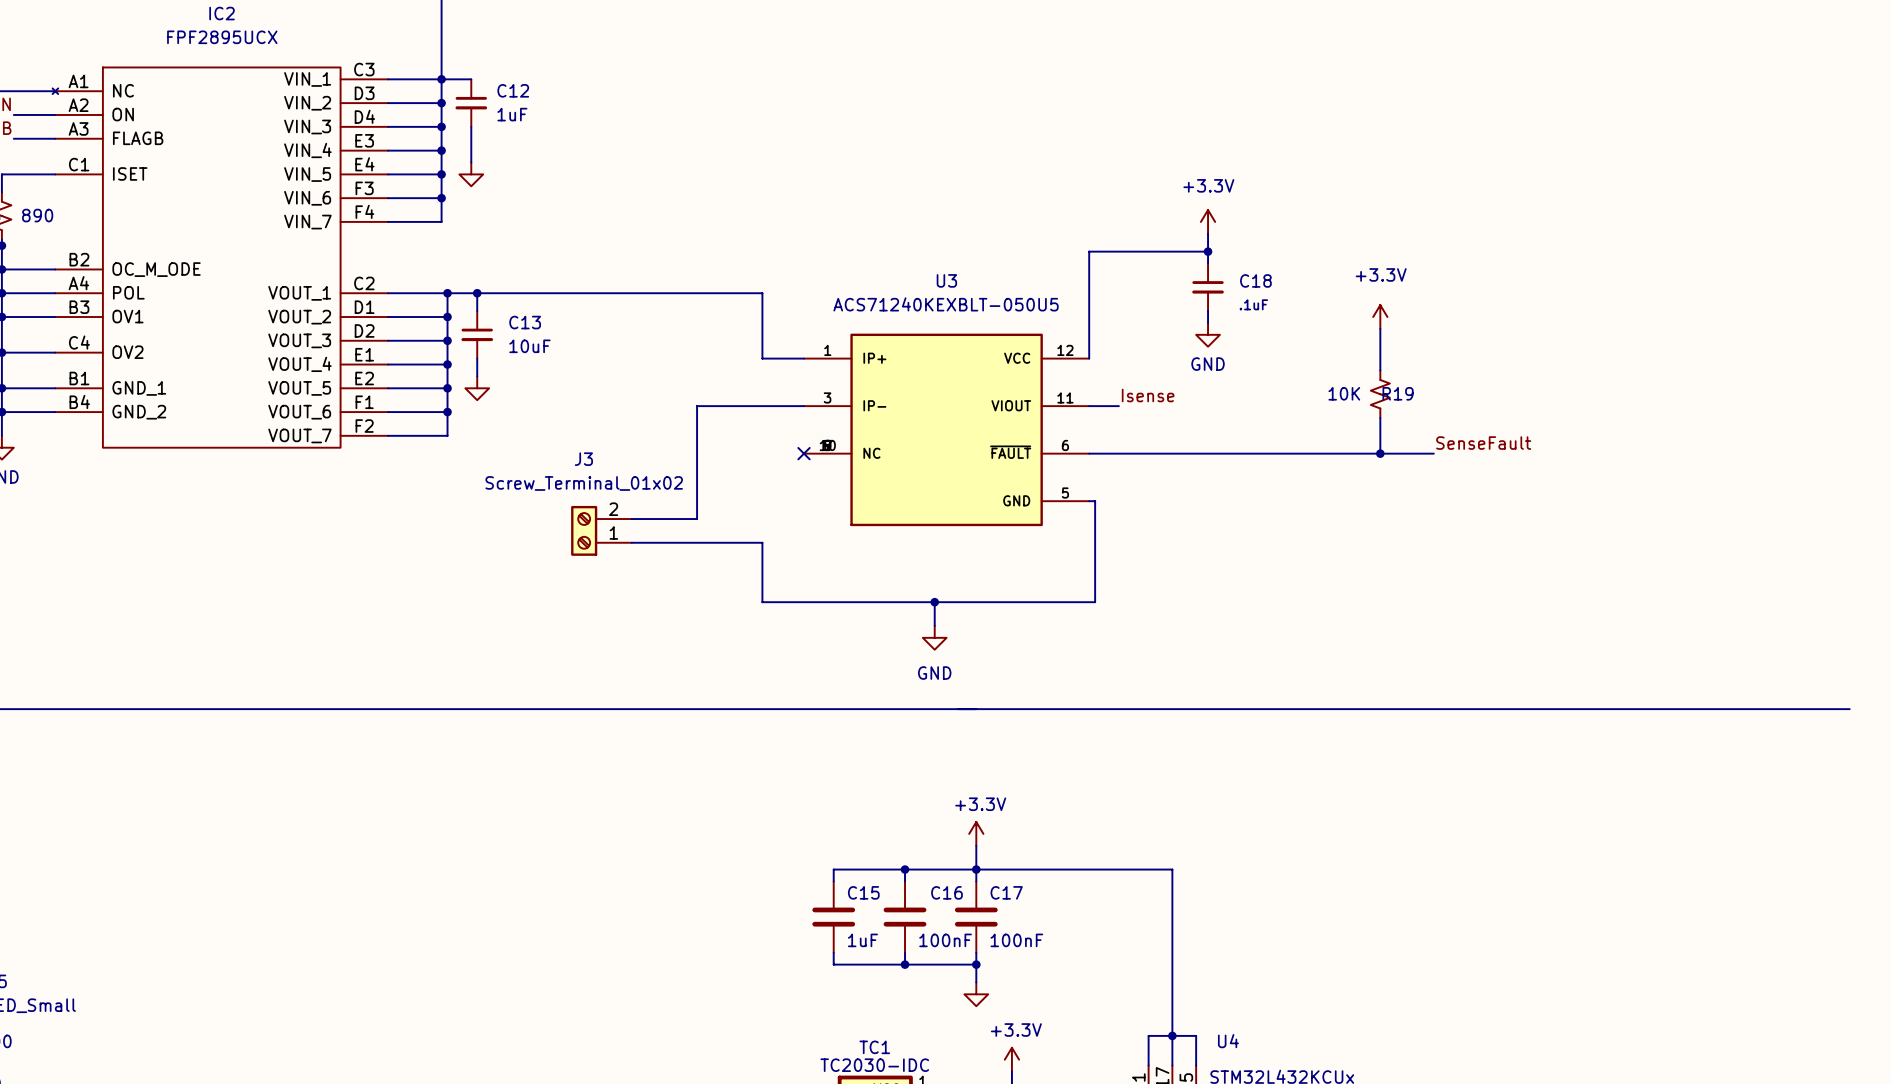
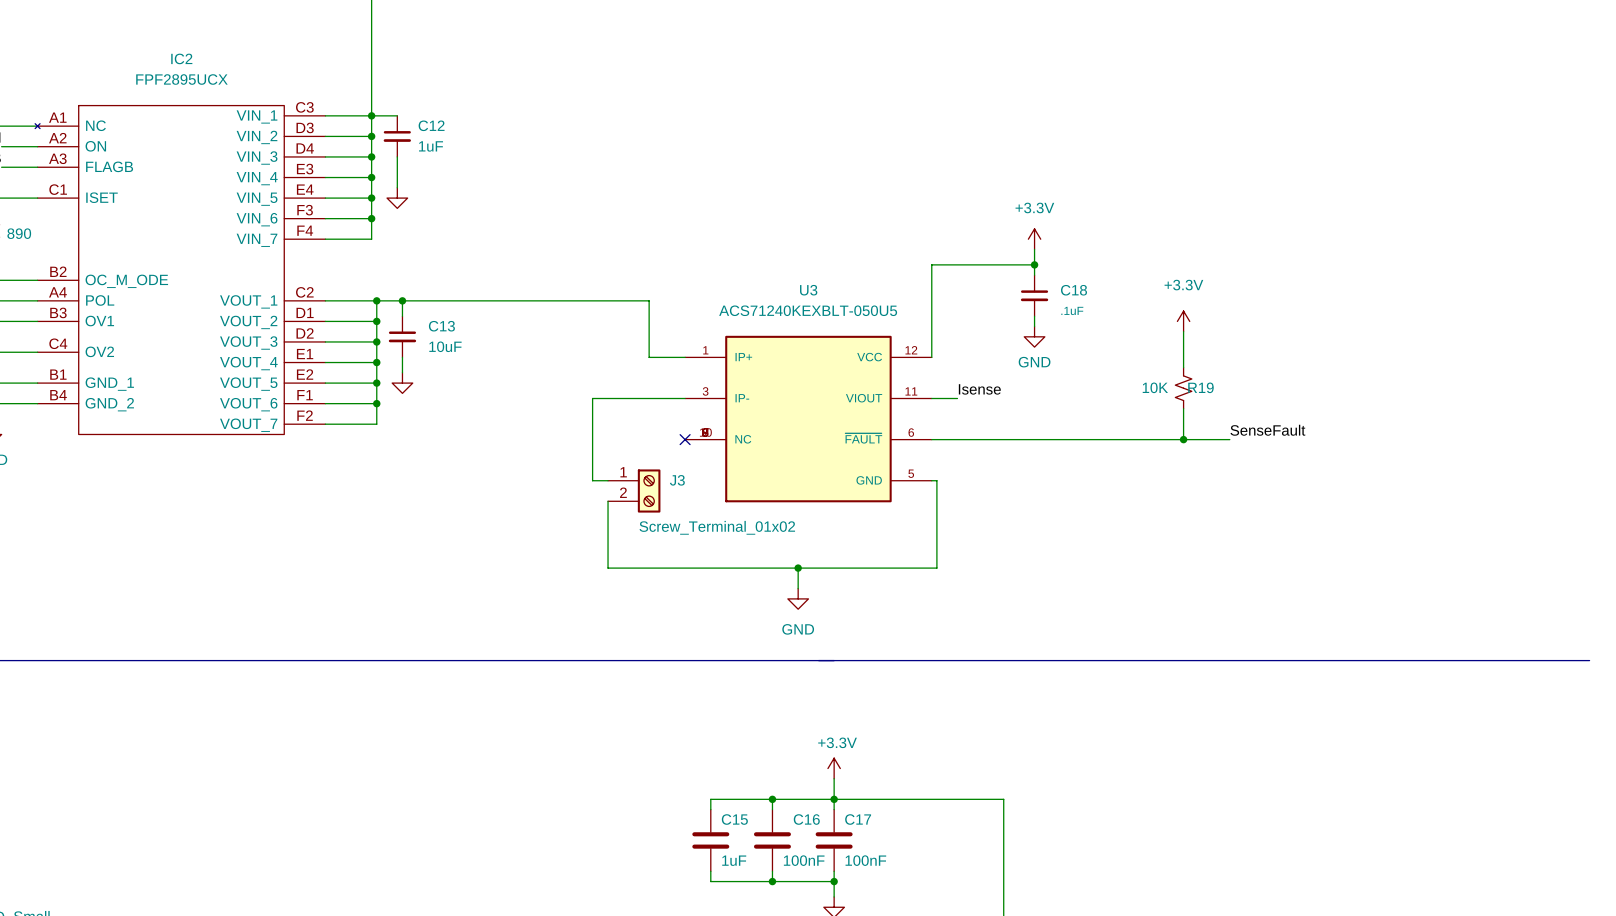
J3 name position: J3 (583, 459) -> J3 (677, 480)
J3 value position: Screw_Terminal_01x02 (584, 483) -> Screw_Terminal_01x02 (717, 527)
wire: (697, 501) (697, 519) (631, 519) -> (592, 480) (608, 480)
J3 rotation: 0° (584, 530) -> 180° (649, 491)
J3 position: (601, 530) -> (634, 491)
wire: (631, 542) (762, 542) (762, 602) -> (608, 501) (608, 568) (649, 568)

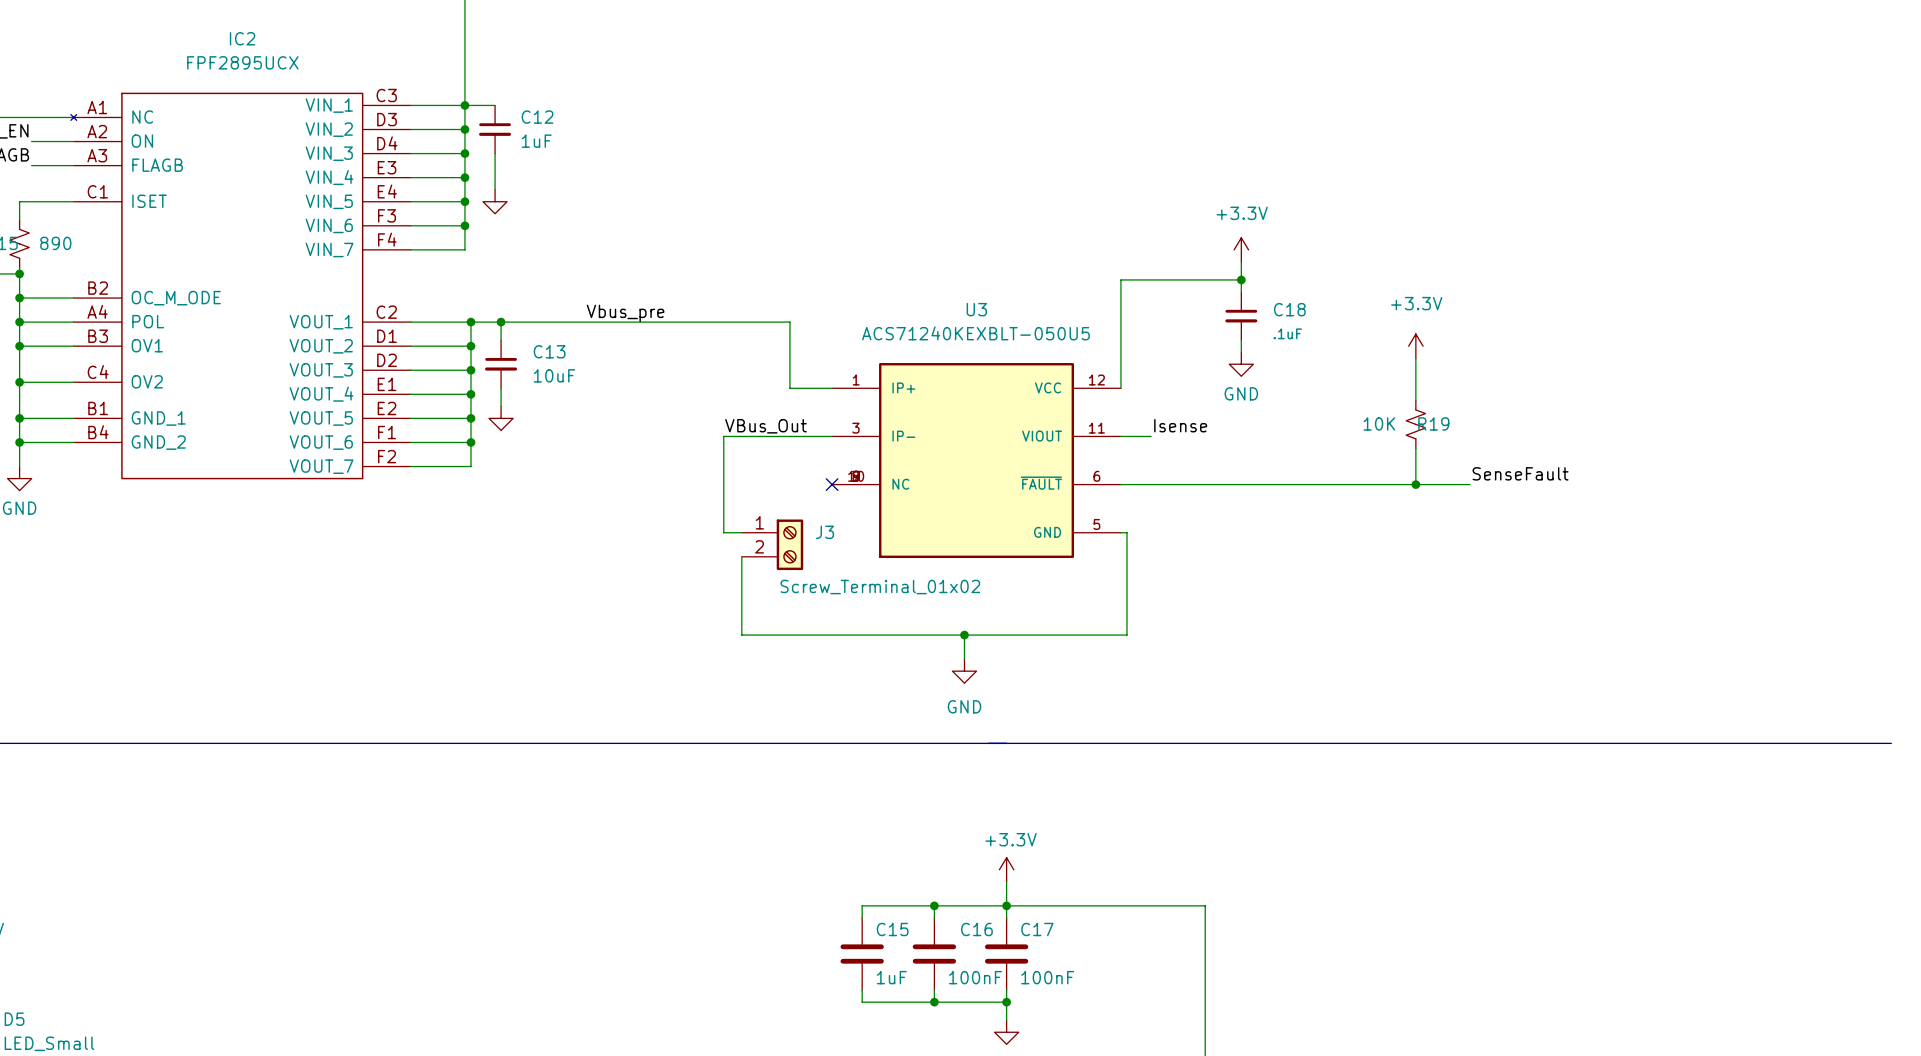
label: none -> Vbus_pre (625, 313)
label: none -> VBus_Out (765, 426)

